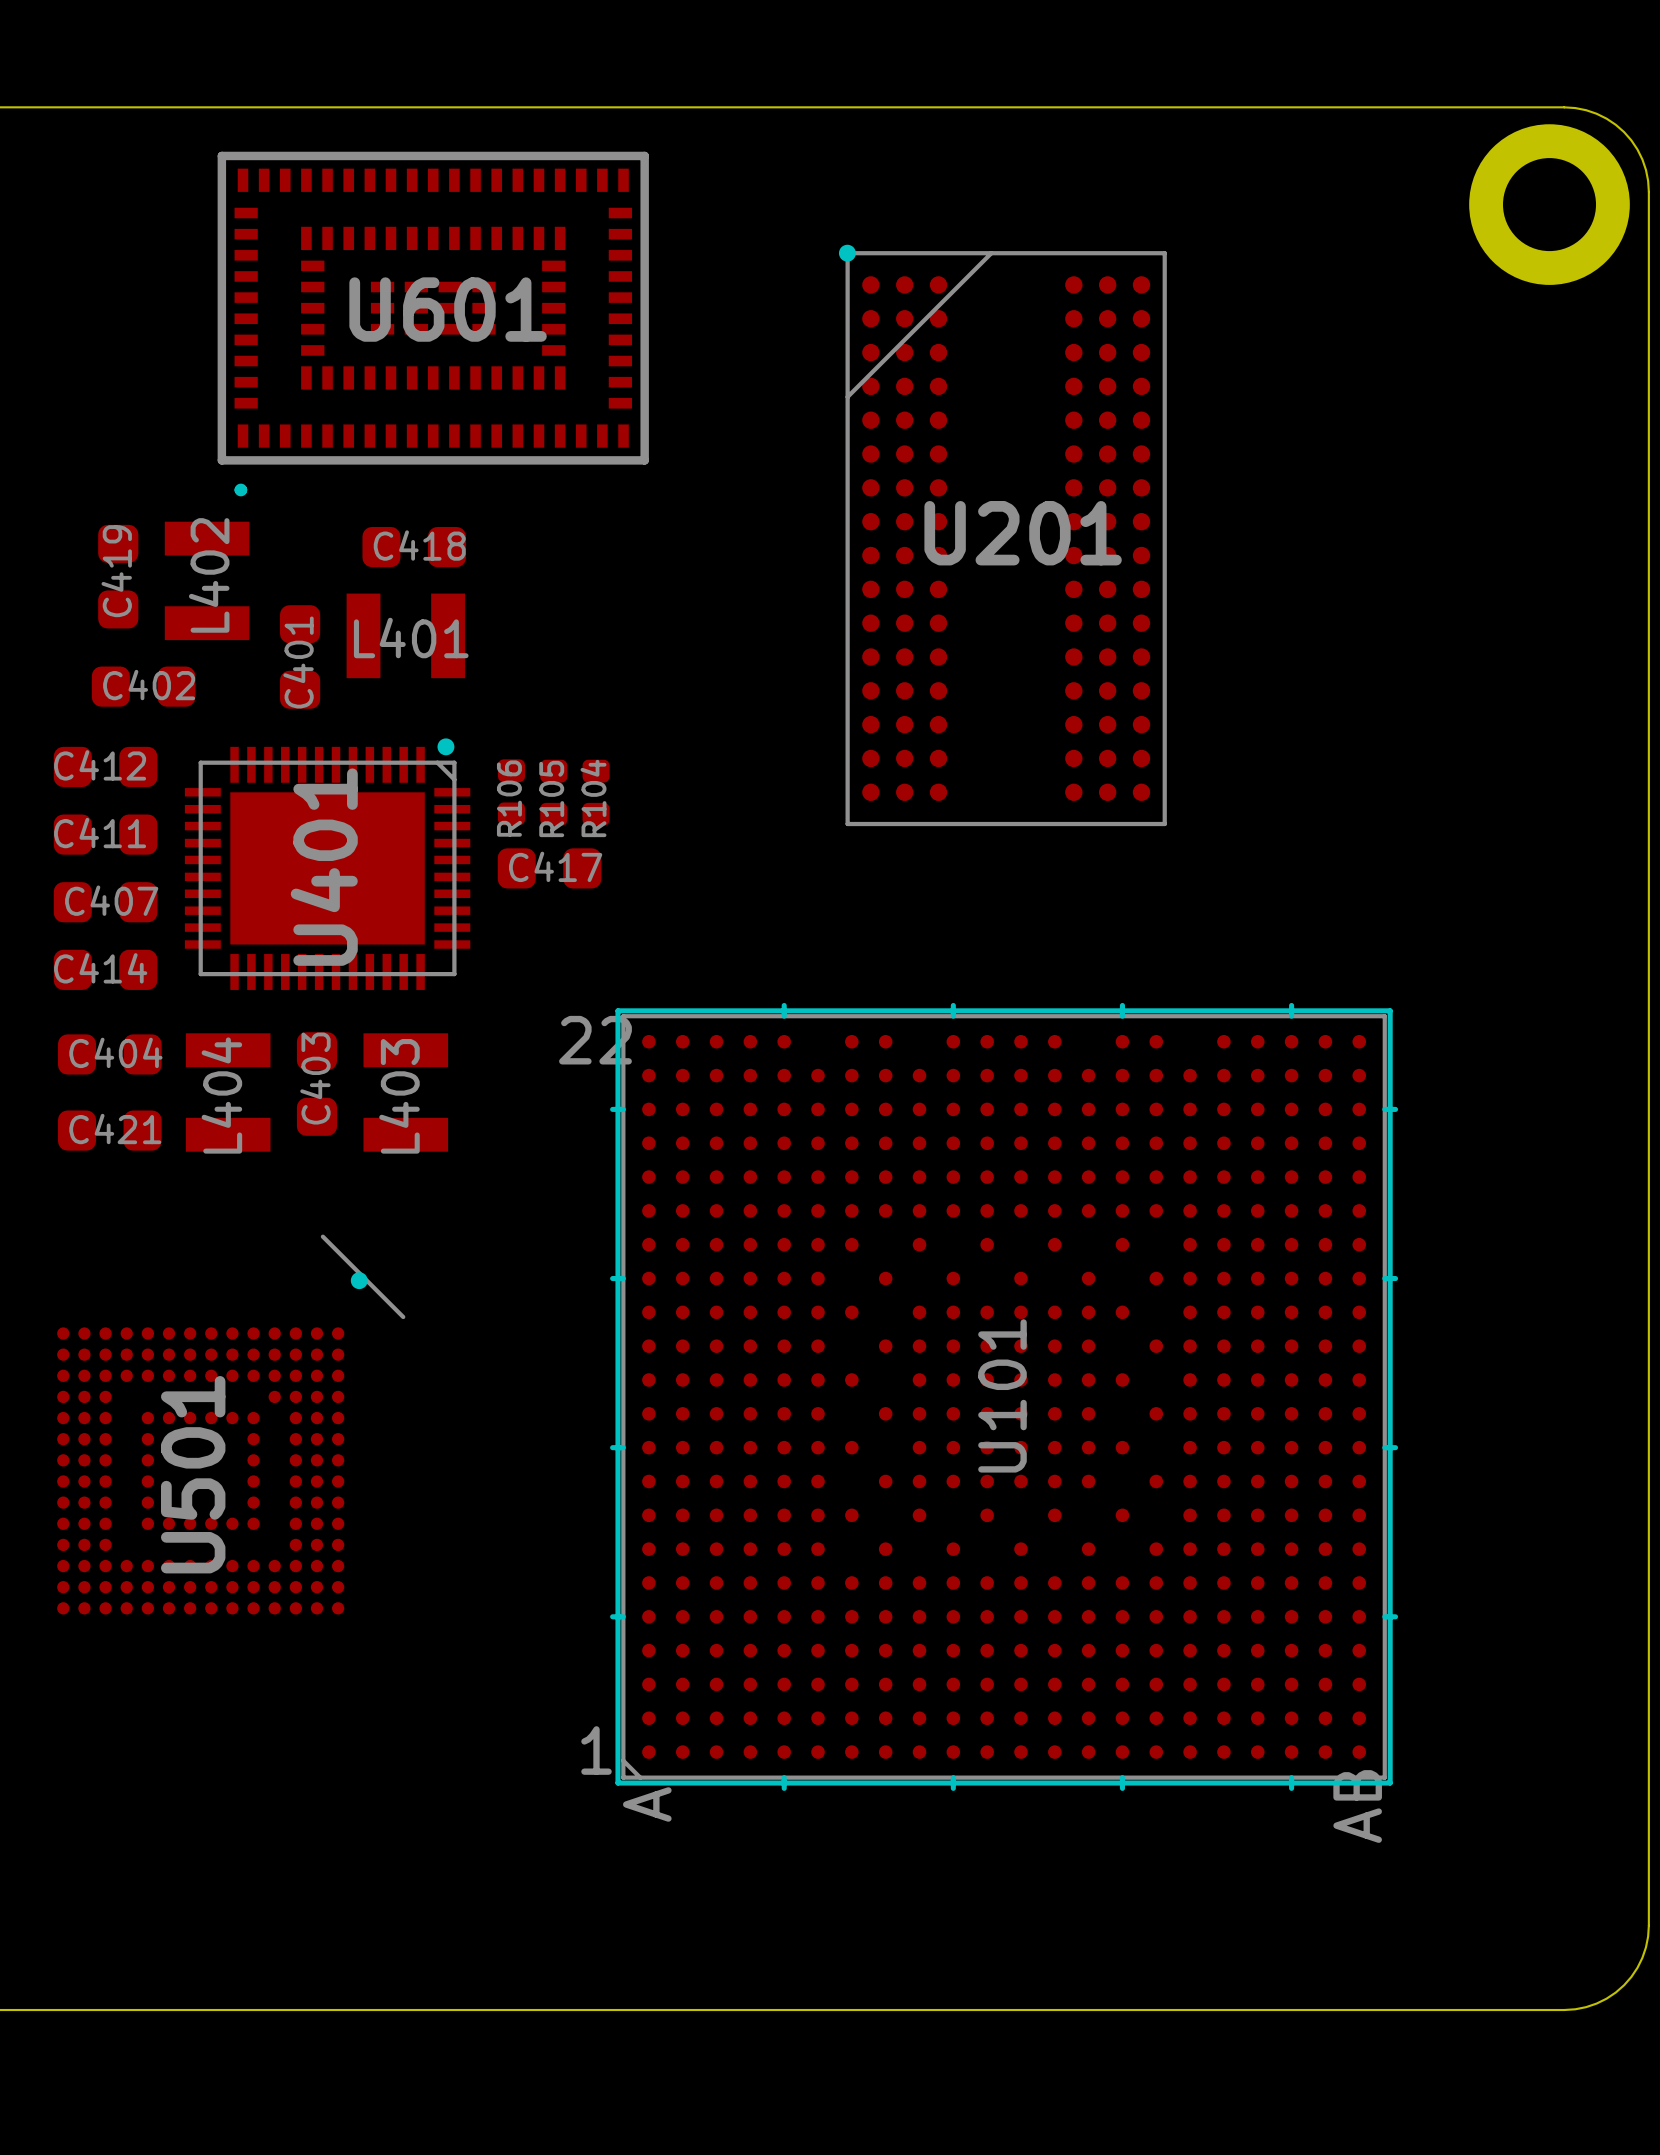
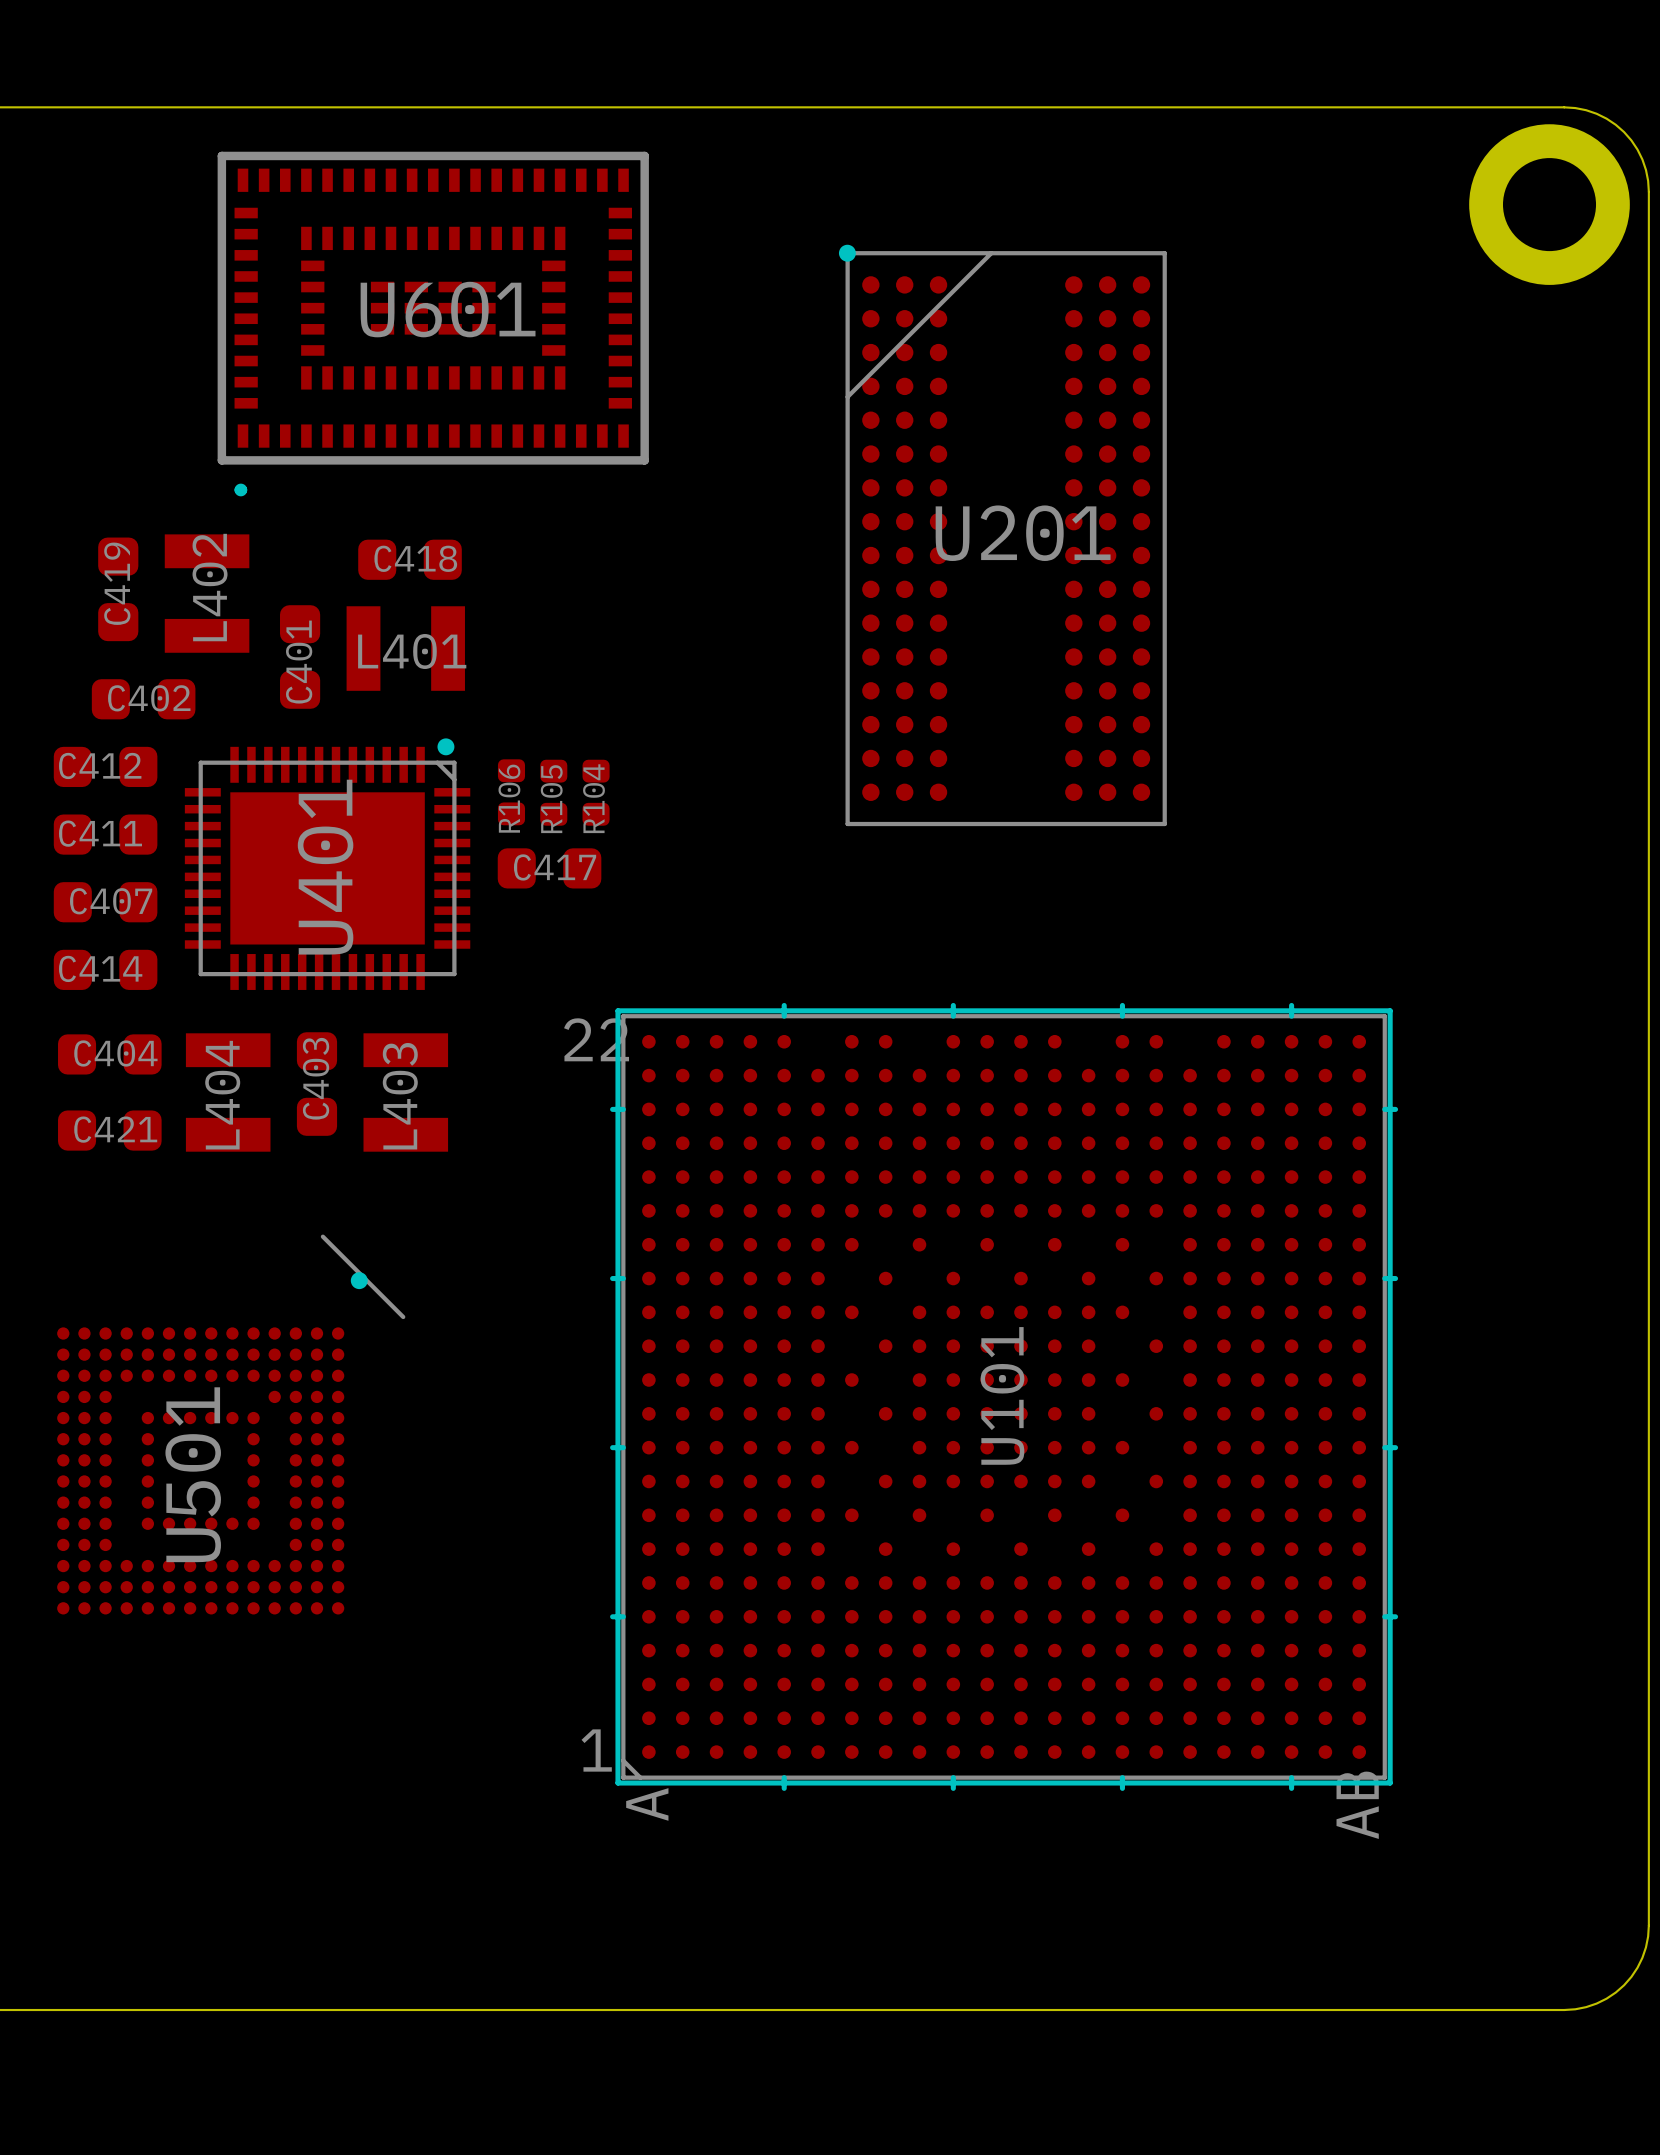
C418 position: (414, 547) -> (410, 559)
C419 position: (118, 576) -> (118, 589)
L402 position: (207, 580) -> (207, 593)
L401 position: (405, 635) -> (405, 648)
C402 position: (143, 686) -> (143, 699)

